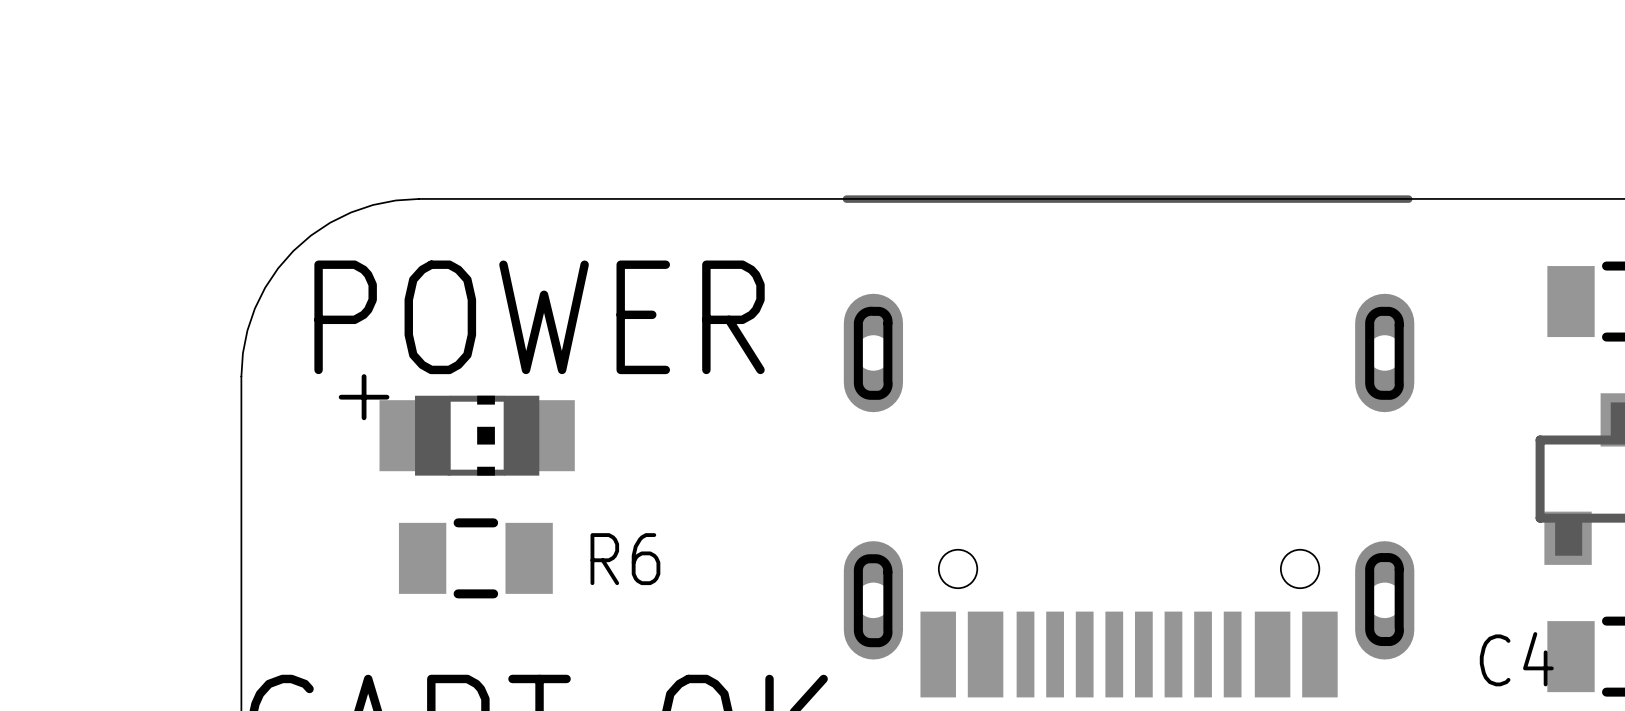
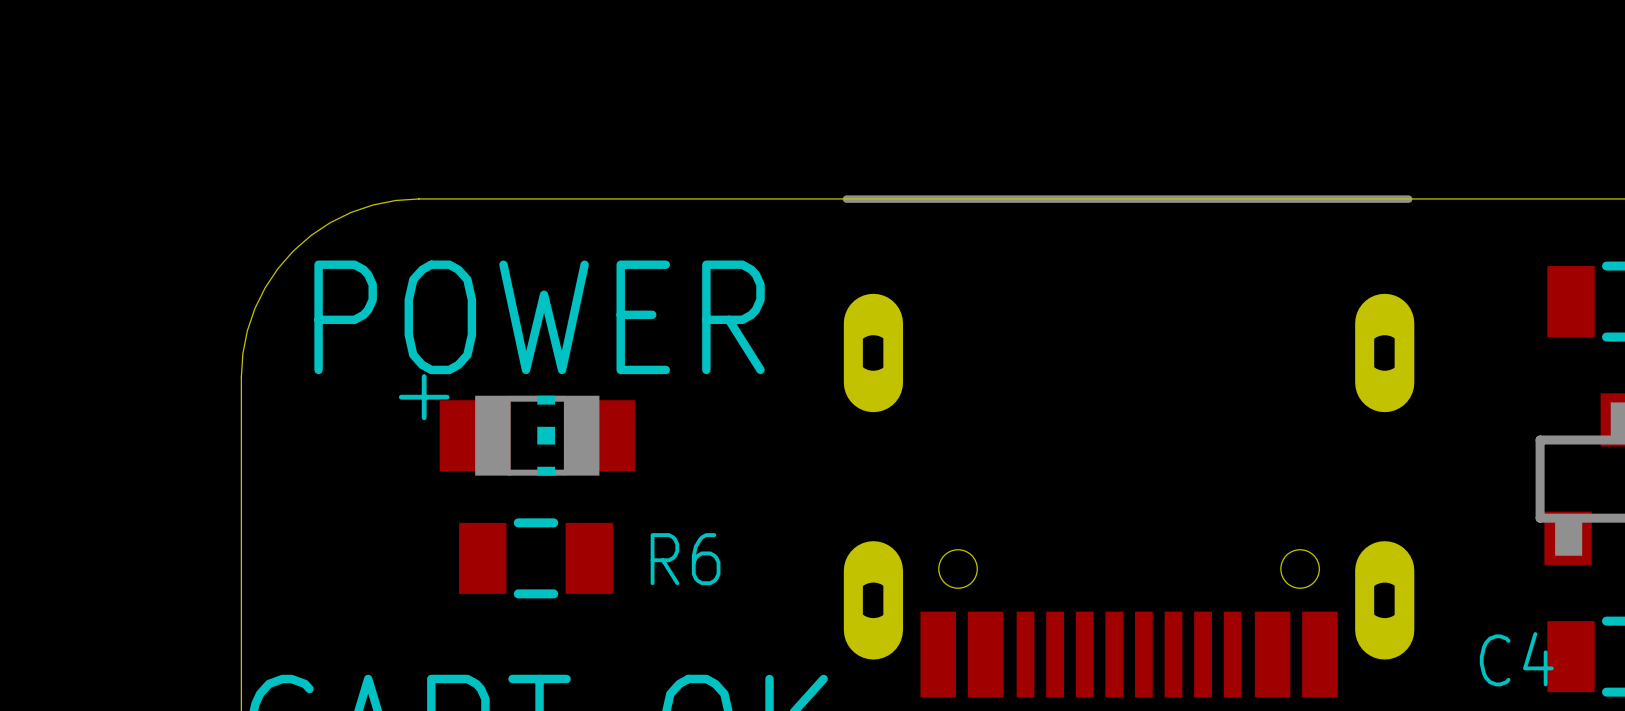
part position: (477, 435) -> (537, 435)
R6 position: (475, 558) -> (536, 558)

